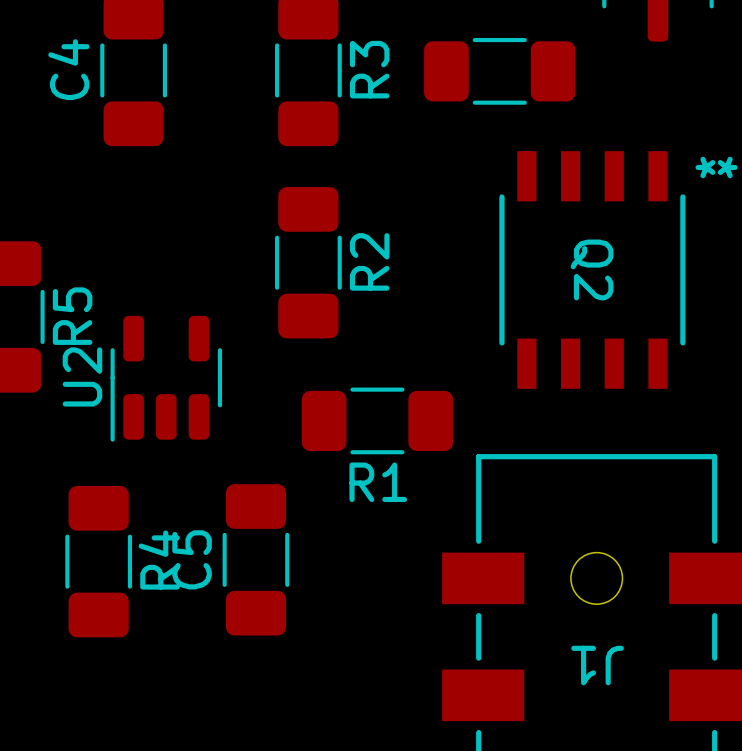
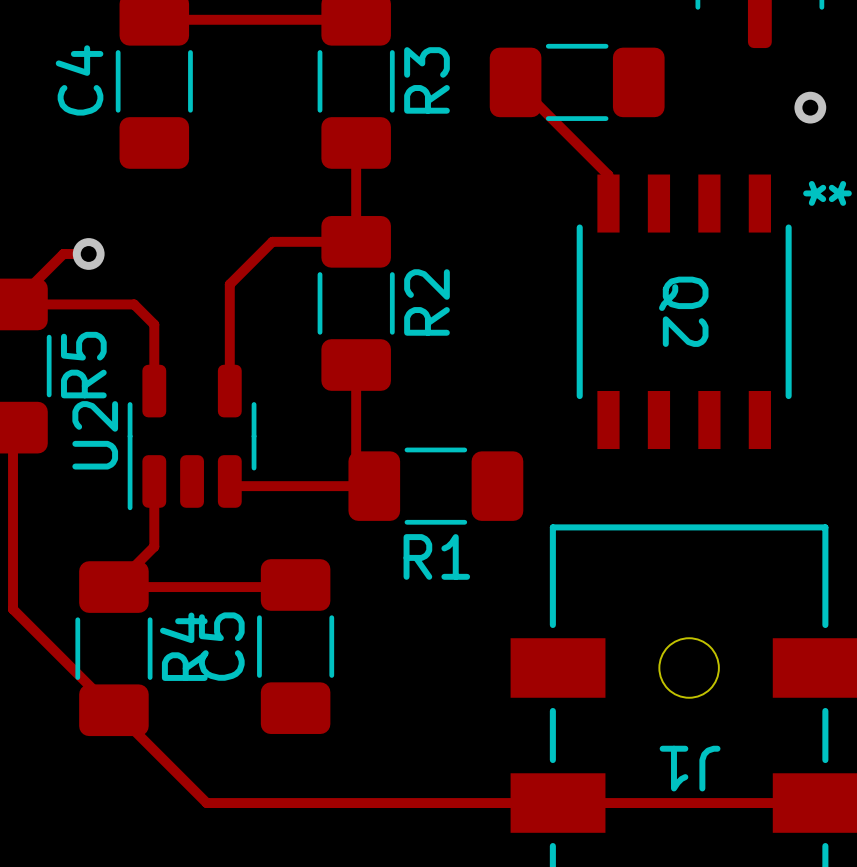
track: none -> (154, 19) (356, 19)
track: none -> (515, 82) (608, 175) (608, 203)
via: none -> (810, 107)
track: none -> (356, 142) (356, 241) (272, 241) (229, 284) (229, 391)
track: none -> (88, 253) (63, 253) (13, 304) (134, 304) (154, 324) (154, 391)
via: none -> (88, 253)
track: none -> (356, 365) (356, 468) (374, 486) (234, 486) (229, 481)
track: none -> (13, 427) (13, 609) (206, 803) (820, 803)
track: none -> (154, 481) (154, 546) (113, 587) (293, 587) (295, 584)

